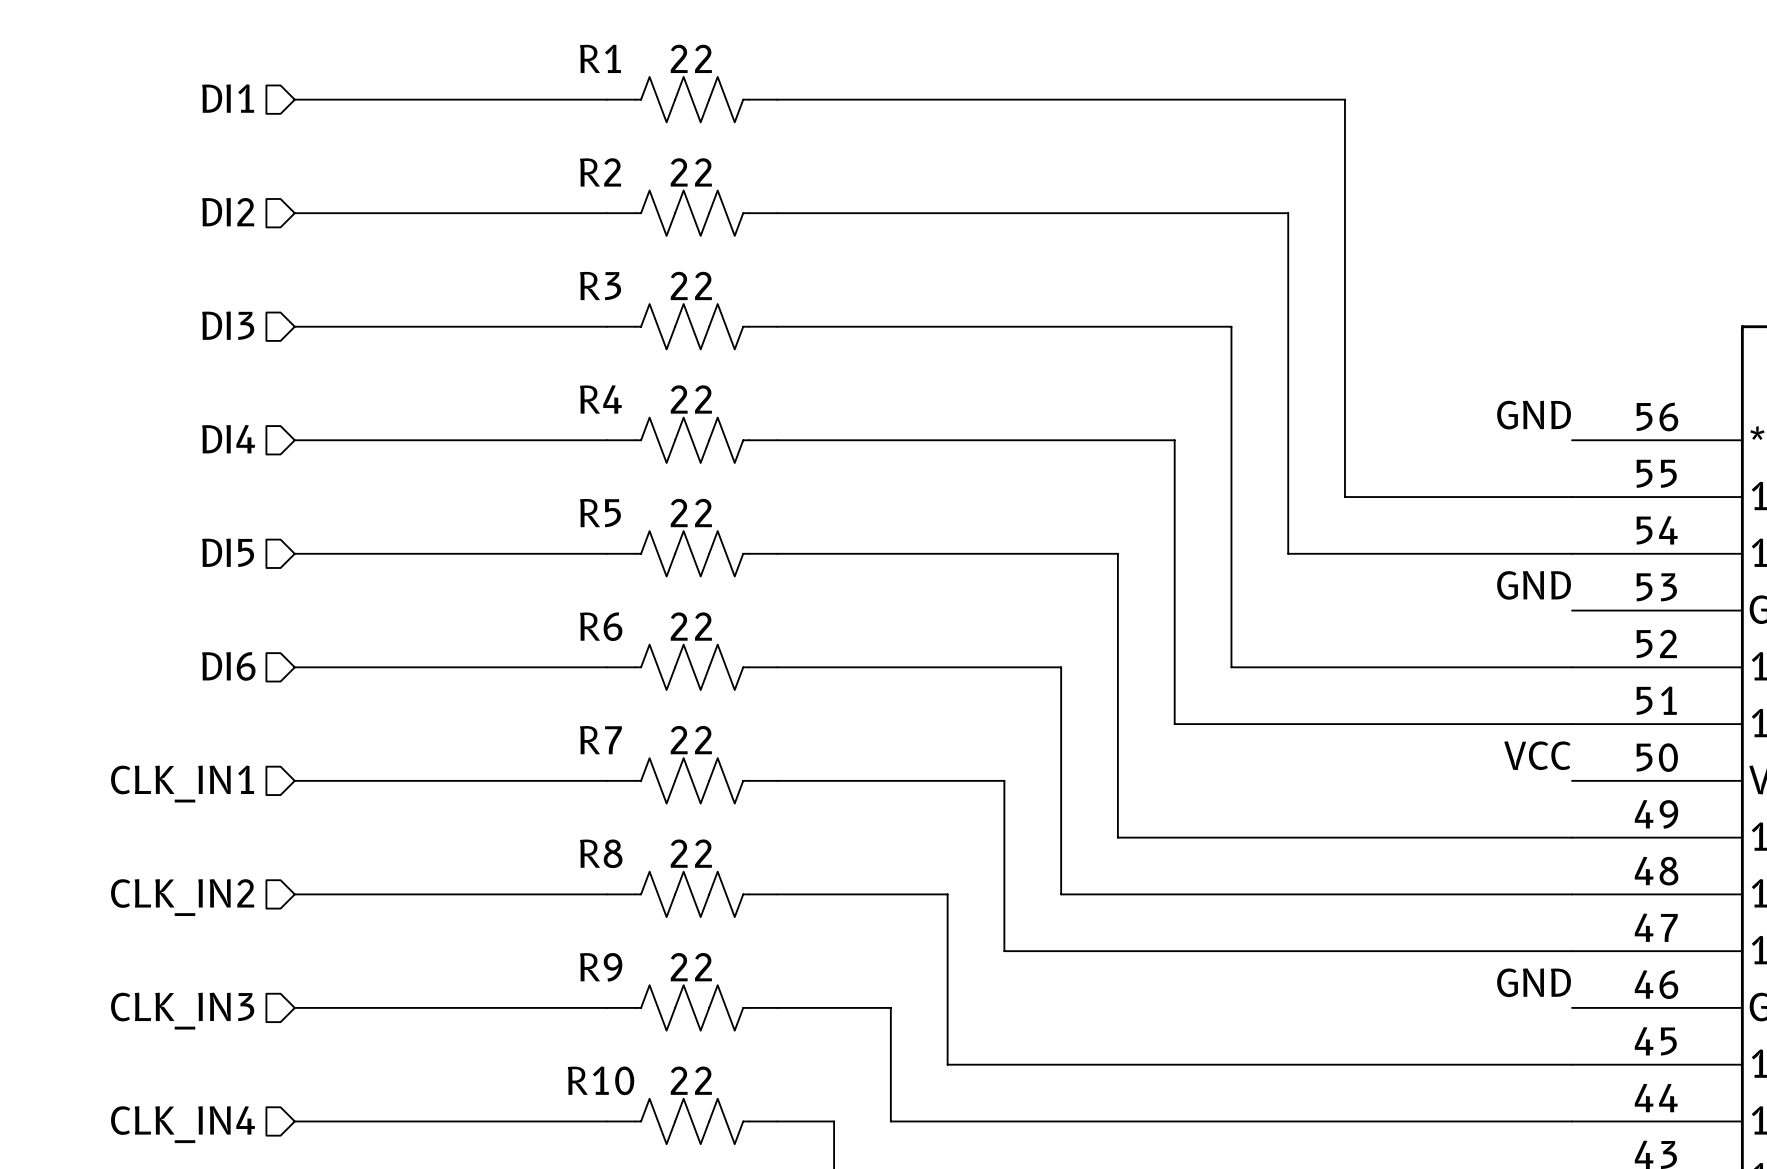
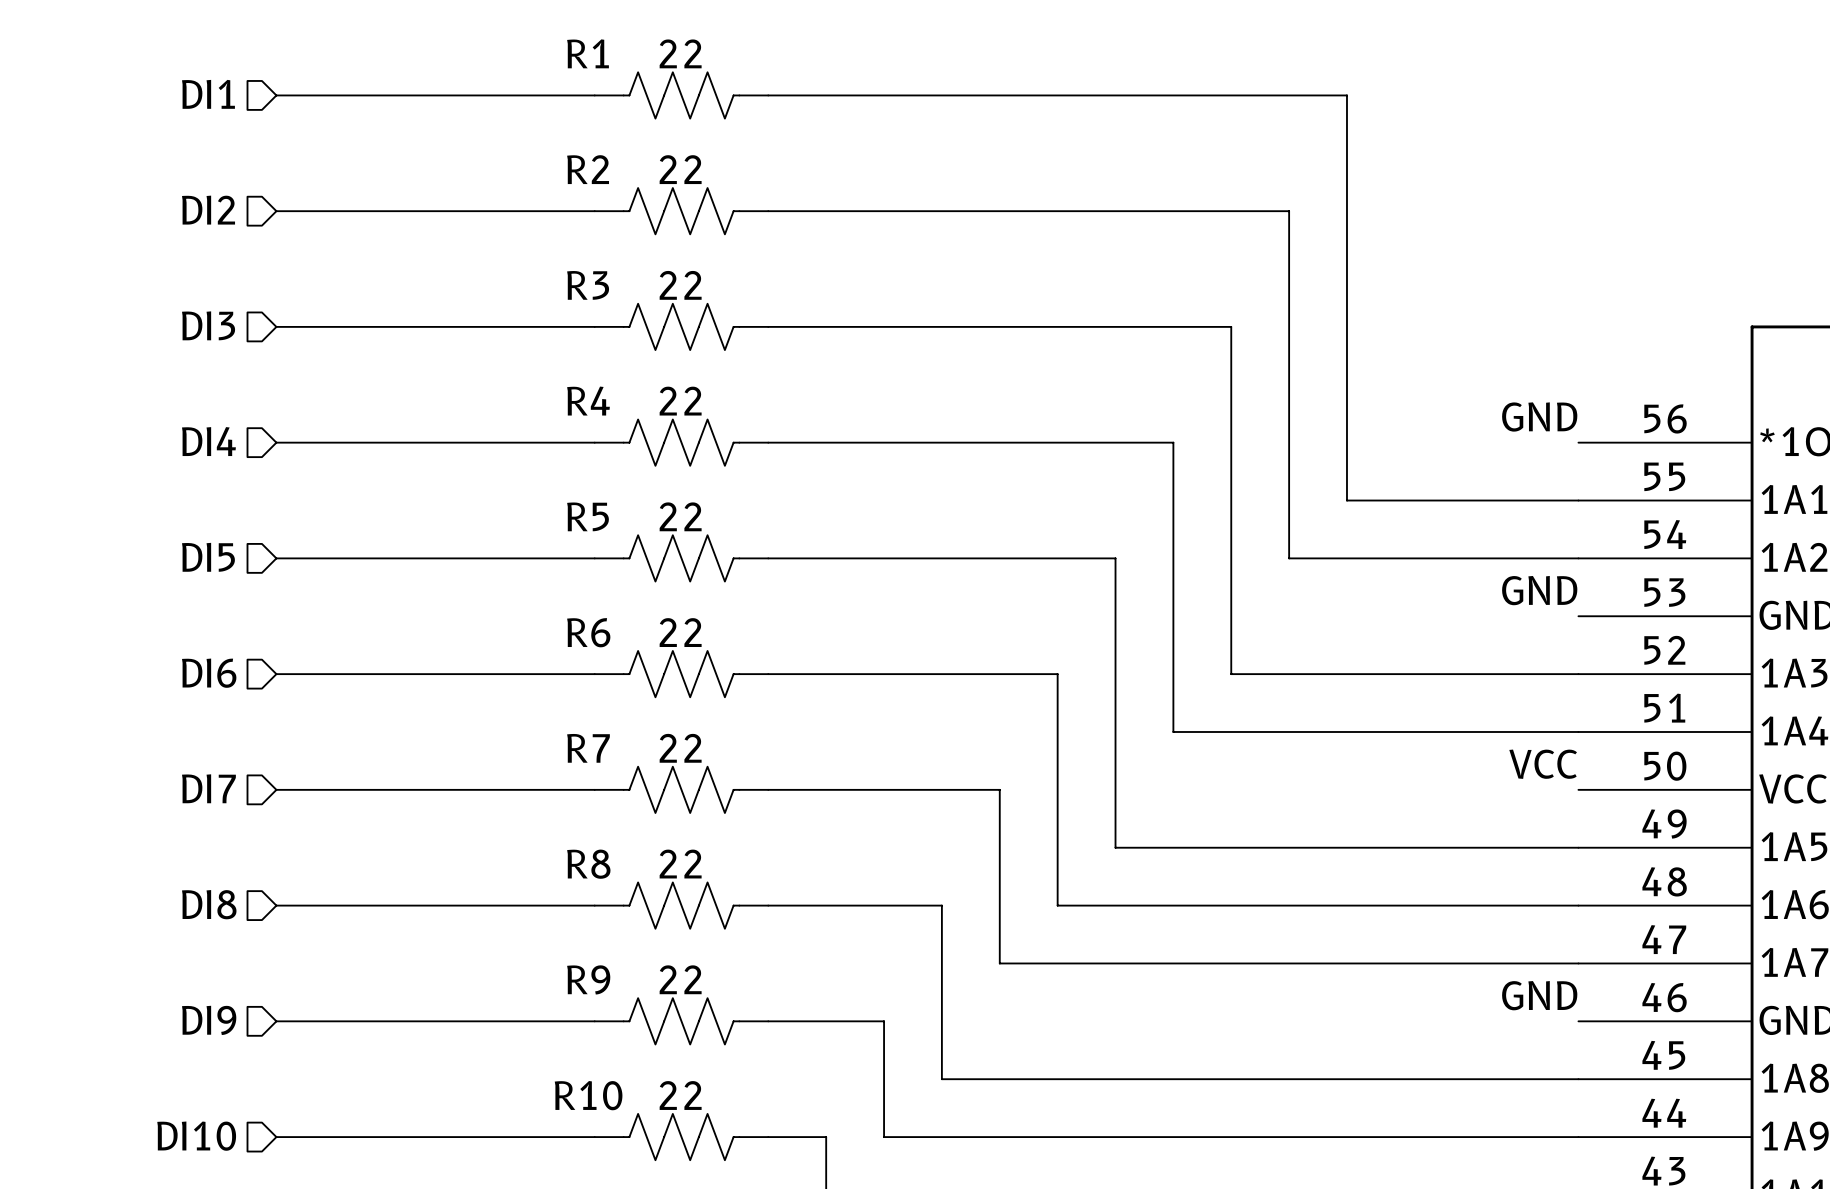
hierarchical label: CLK_IN1 (182, 784) -> DI7 (208, 788)
hierarchical label: CLK_IN2 (182, 897) -> DI8 (209, 904)
hierarchical label: CLK_IN3 (182, 1011) -> DI9 (209, 1020)
hierarchical label: CLK_IN4 (183, 1124) -> DI10 (196, 1136)

